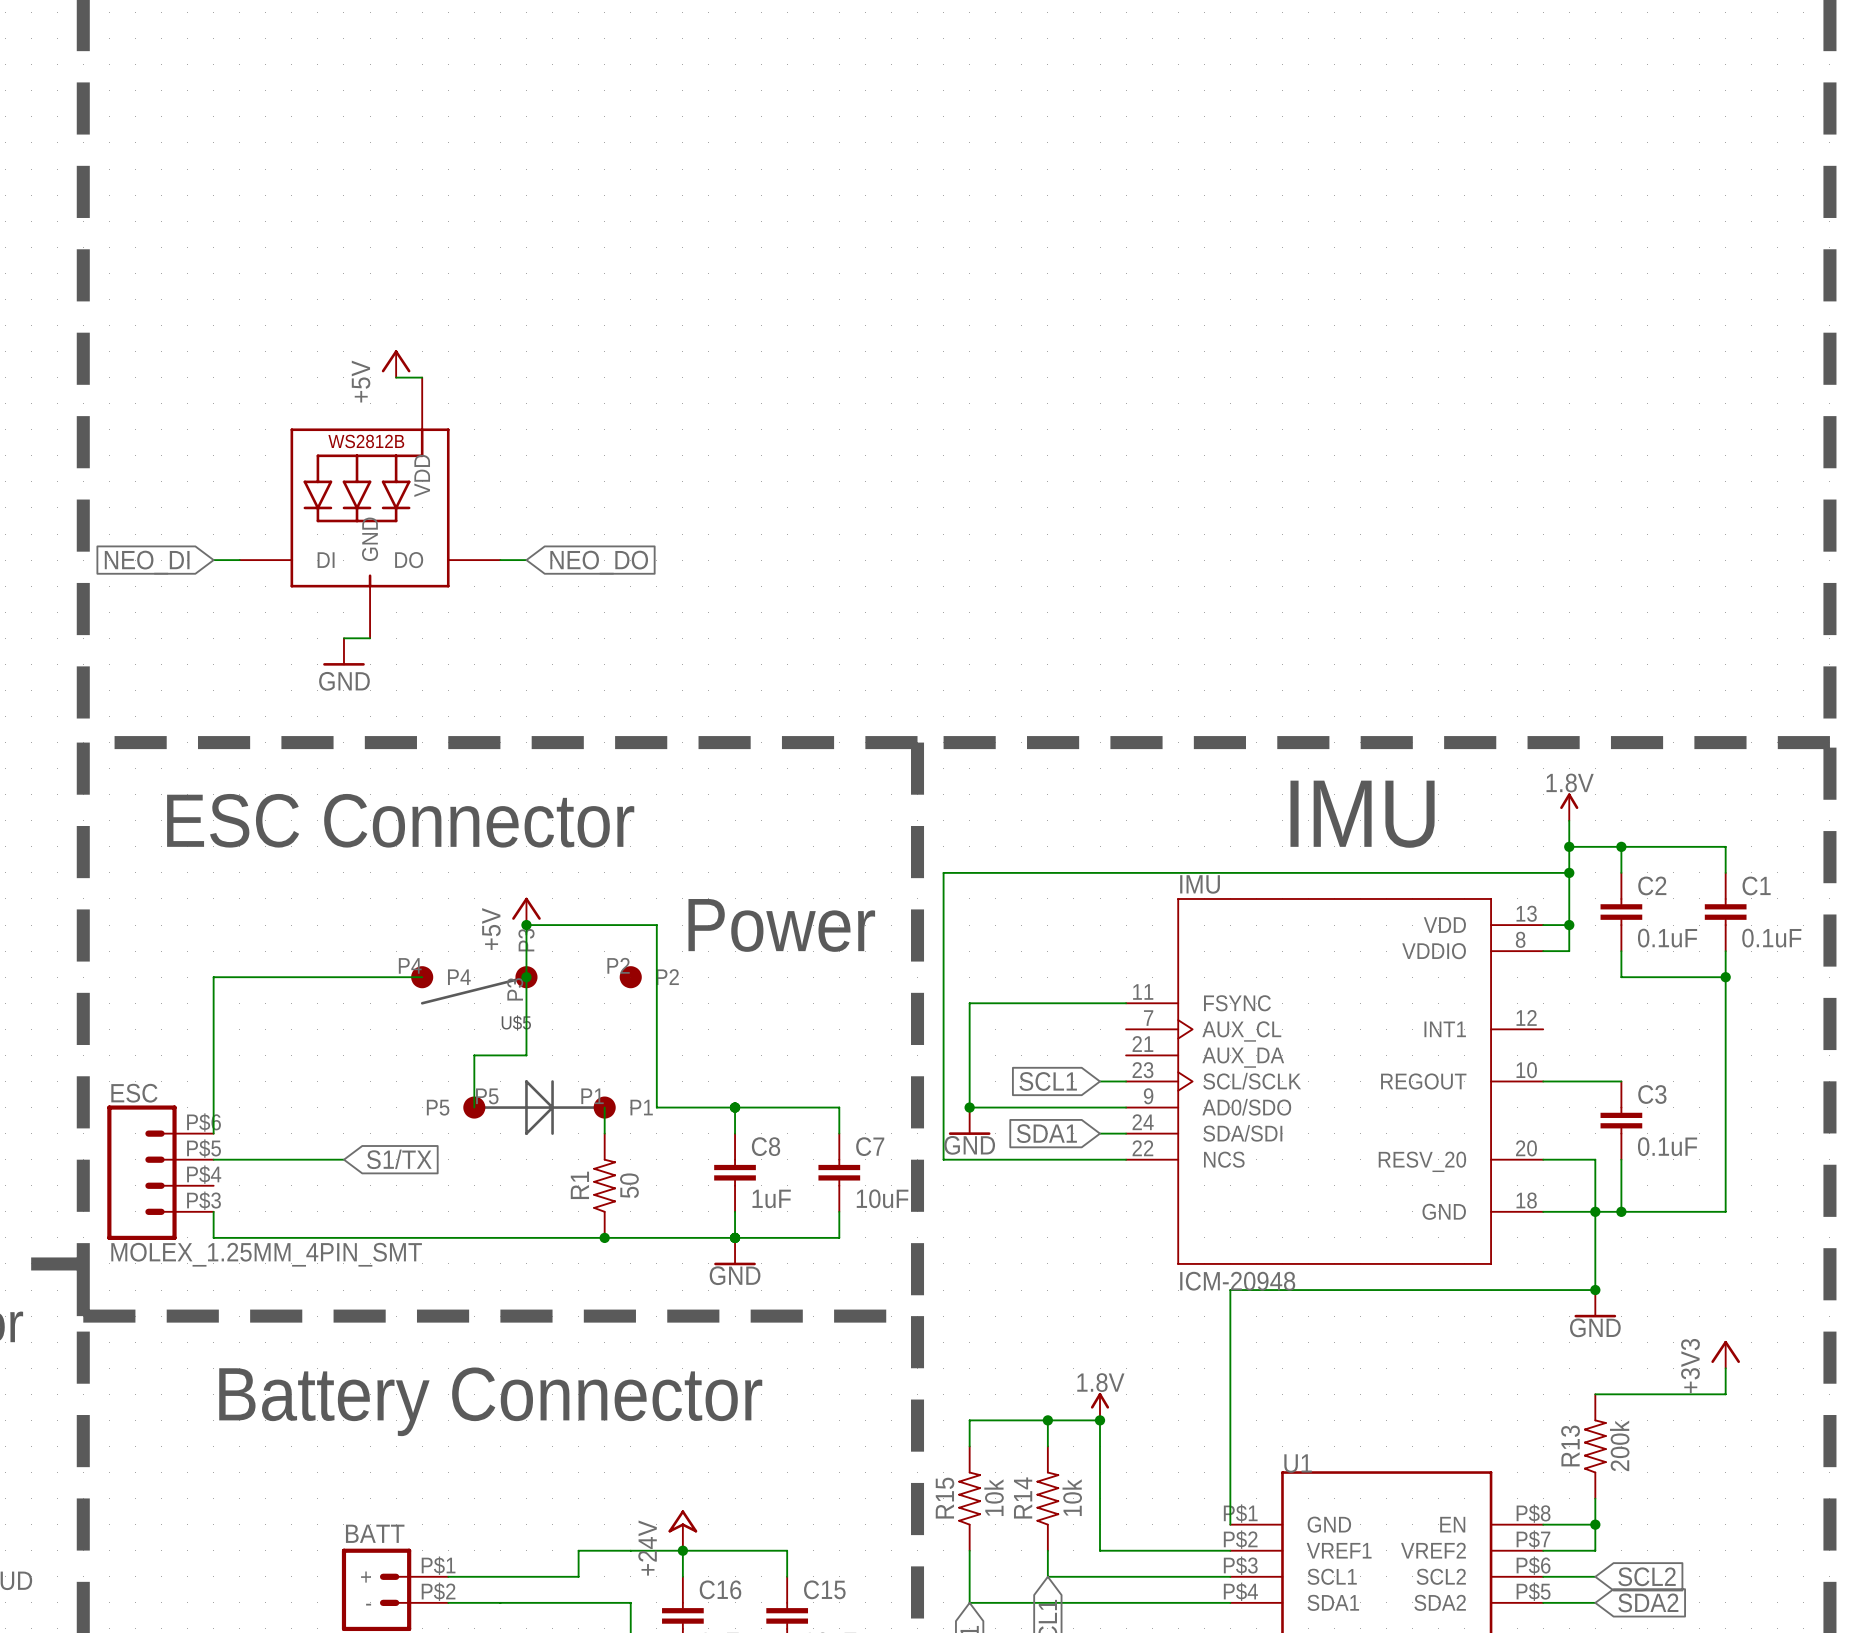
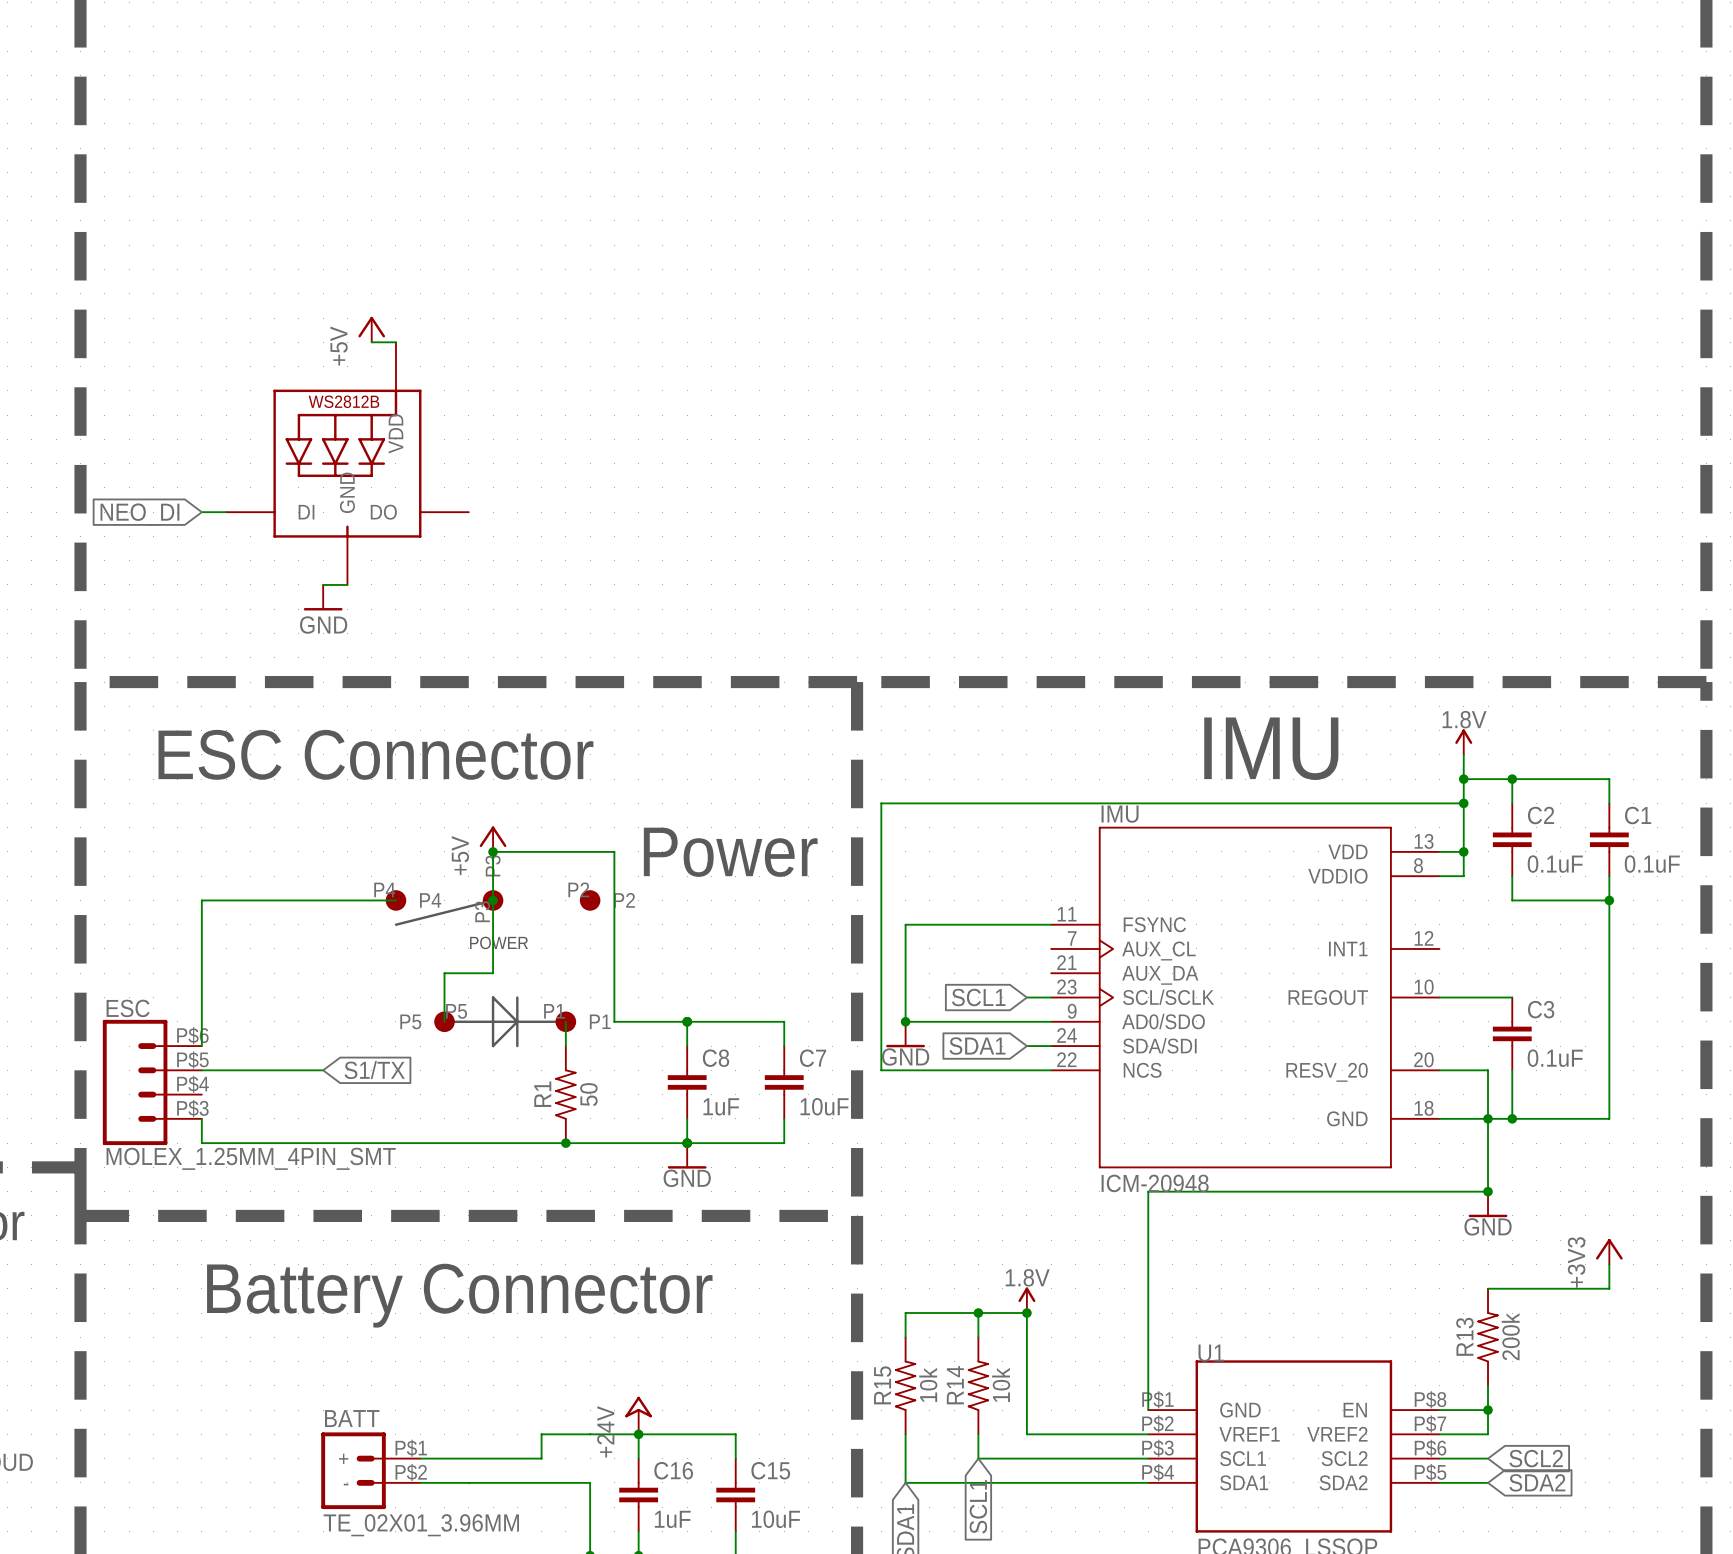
wire: (500, 560) (526, 560) -> none
global label: NEO_DO (599, 562) -> none
U$5 name: U$5 (516, 1022) -> POWER (499, 942)

